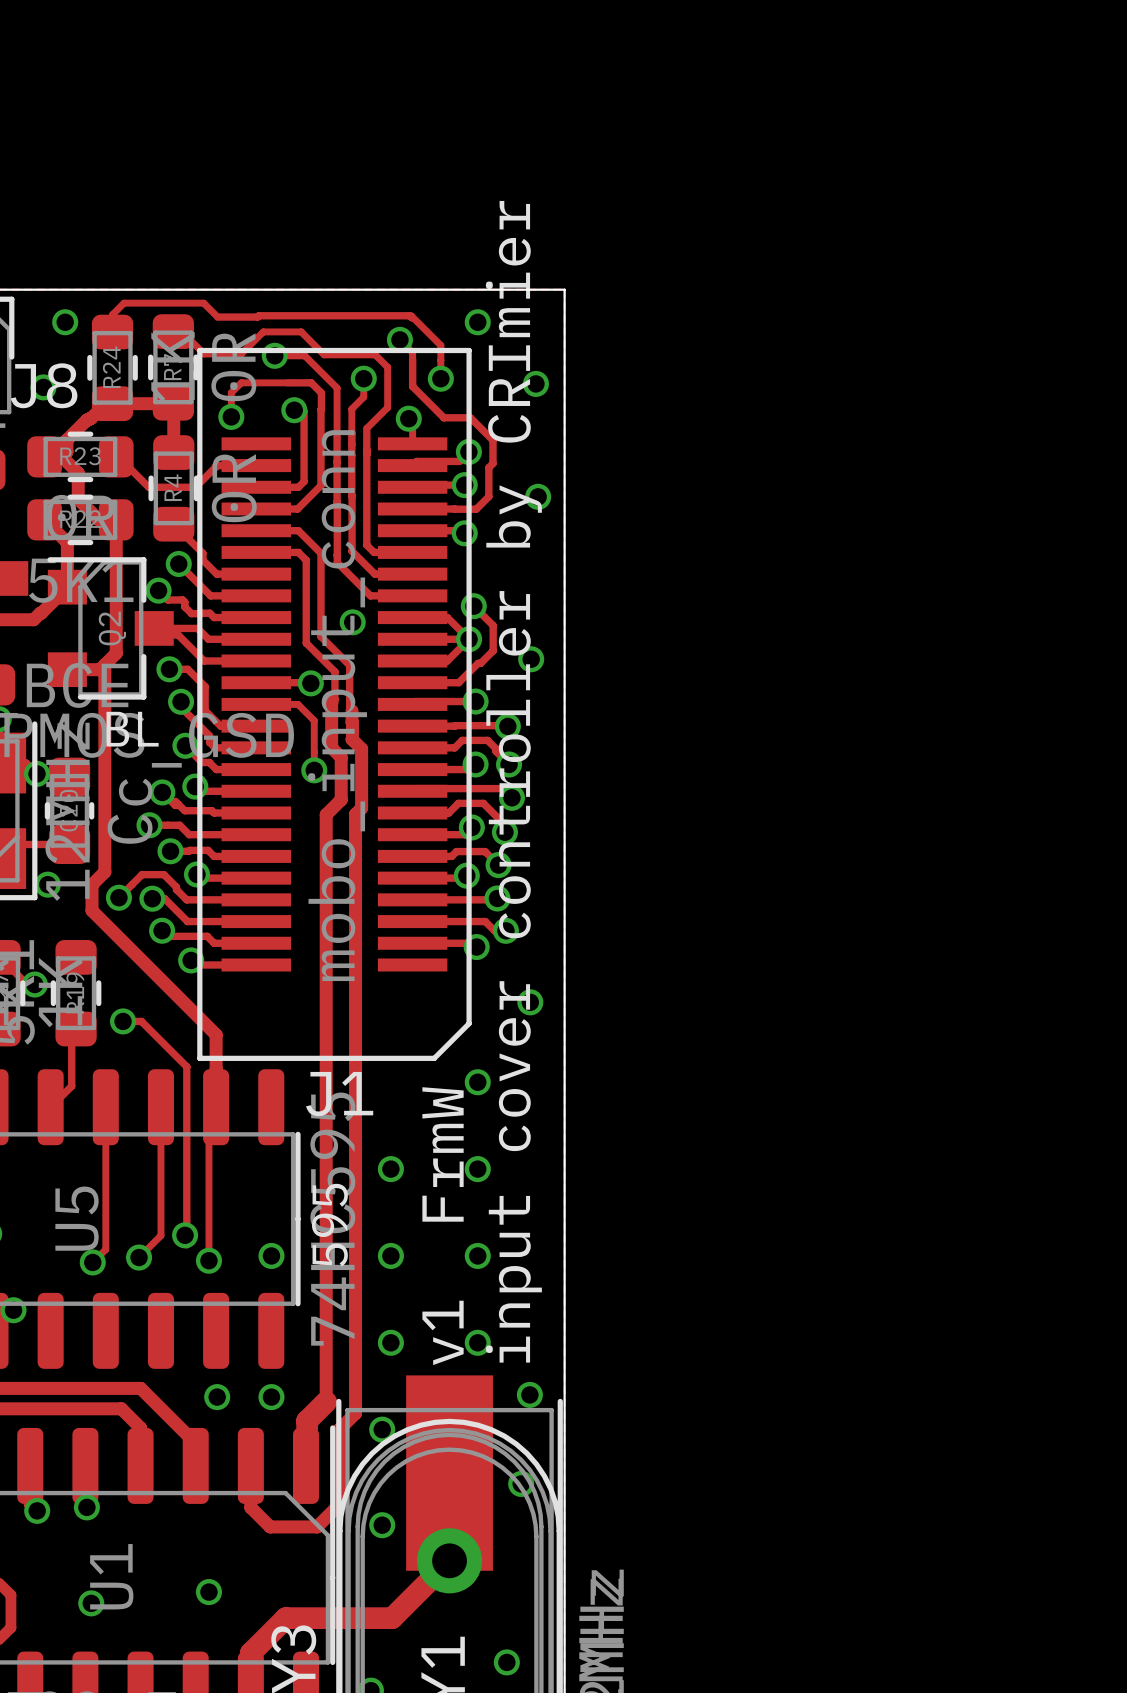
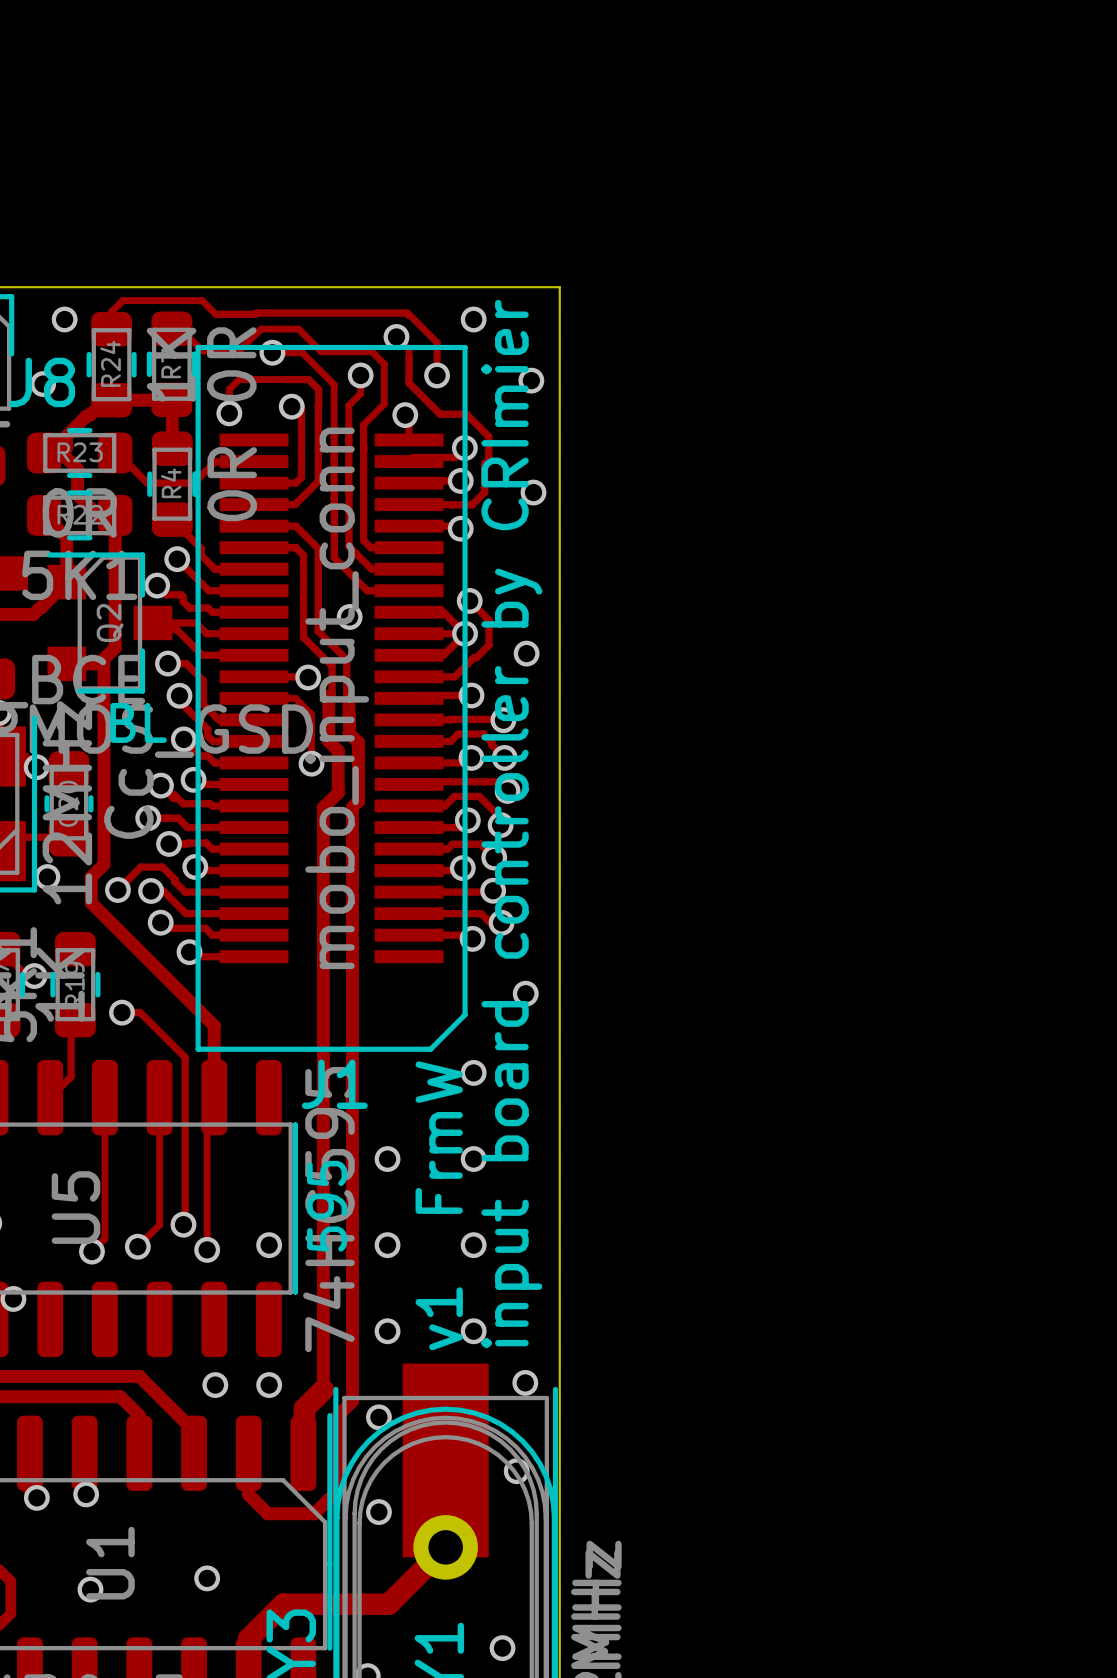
text: input cover controller by CRImier (513, 781) -> input board controller by CRImier (511, 824)

